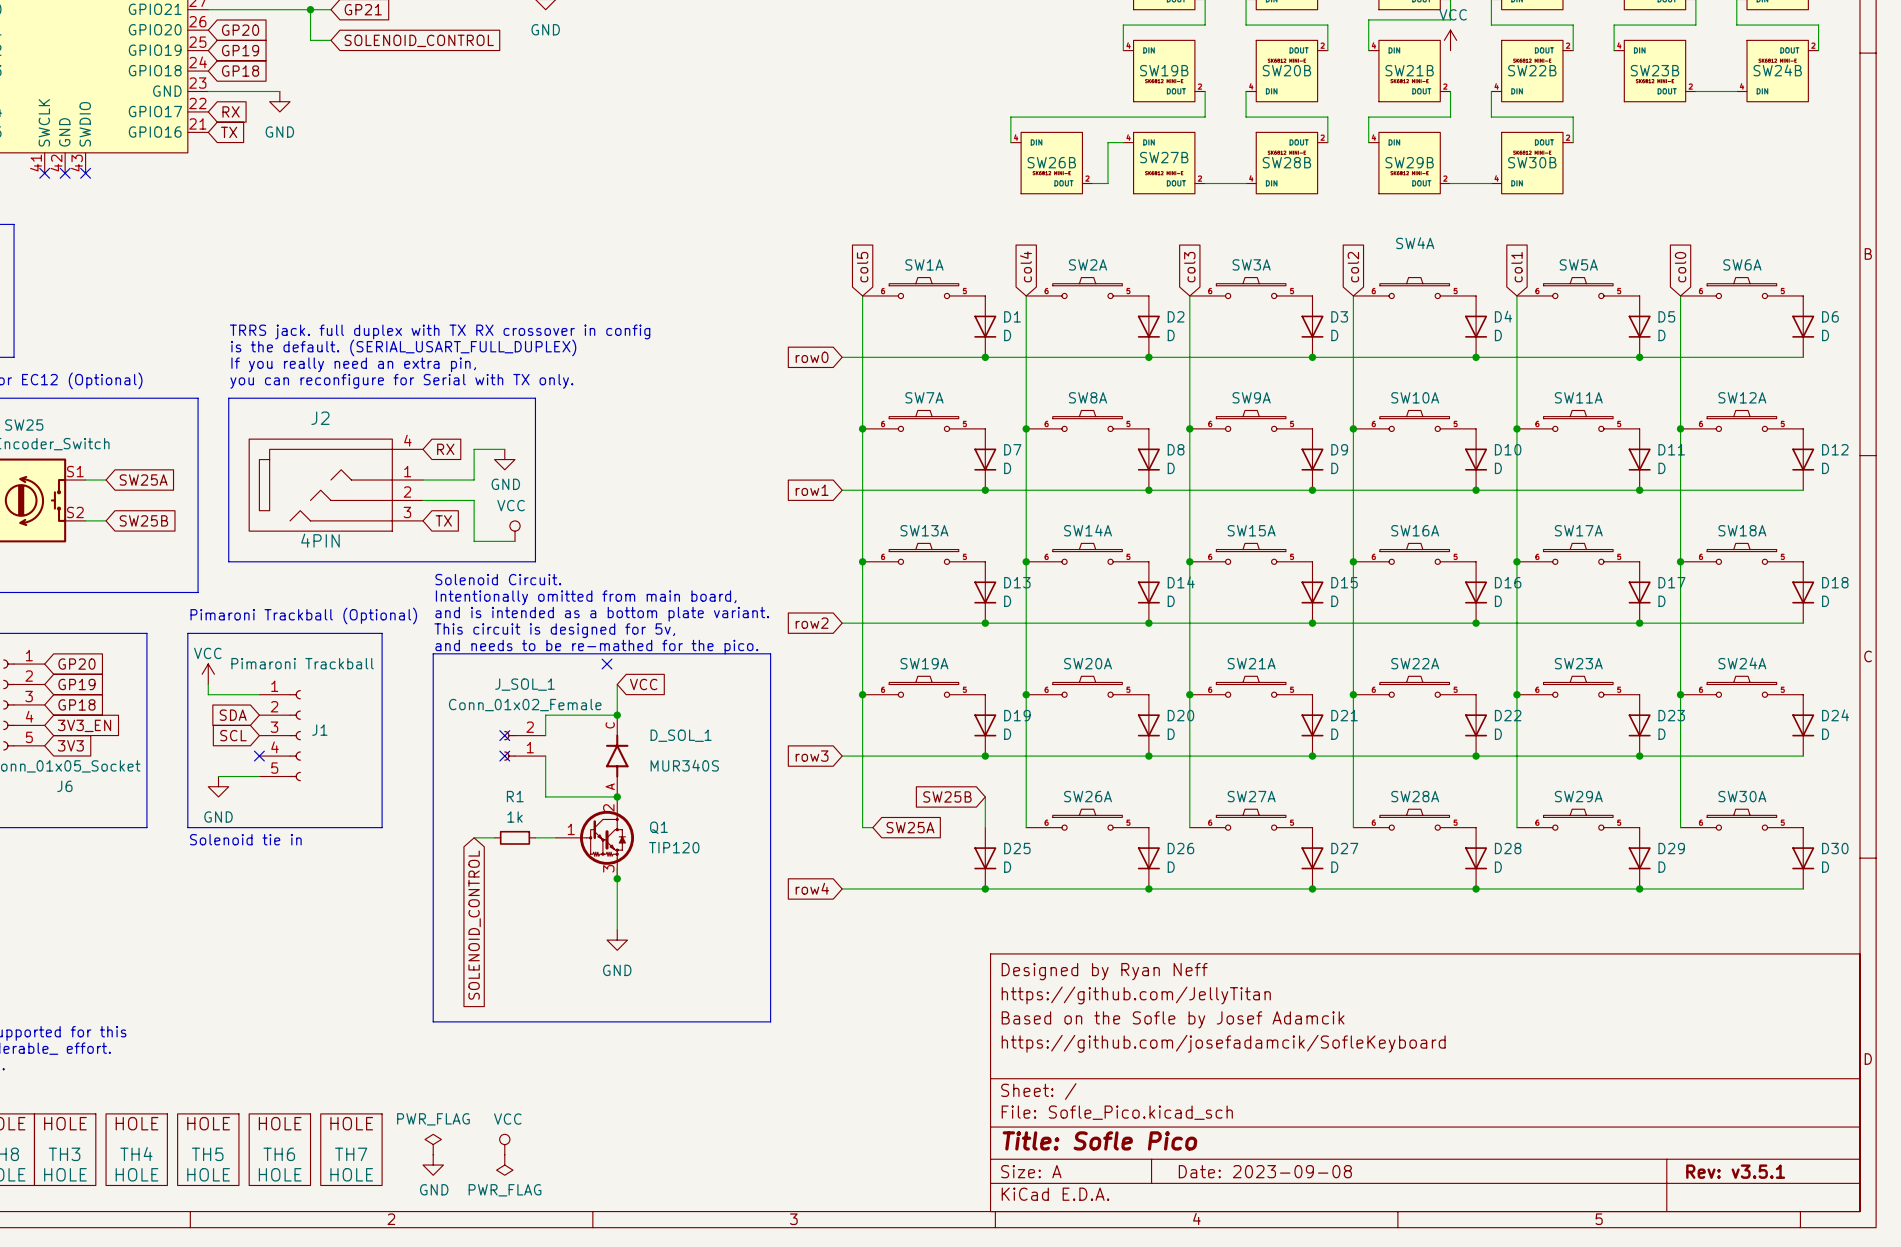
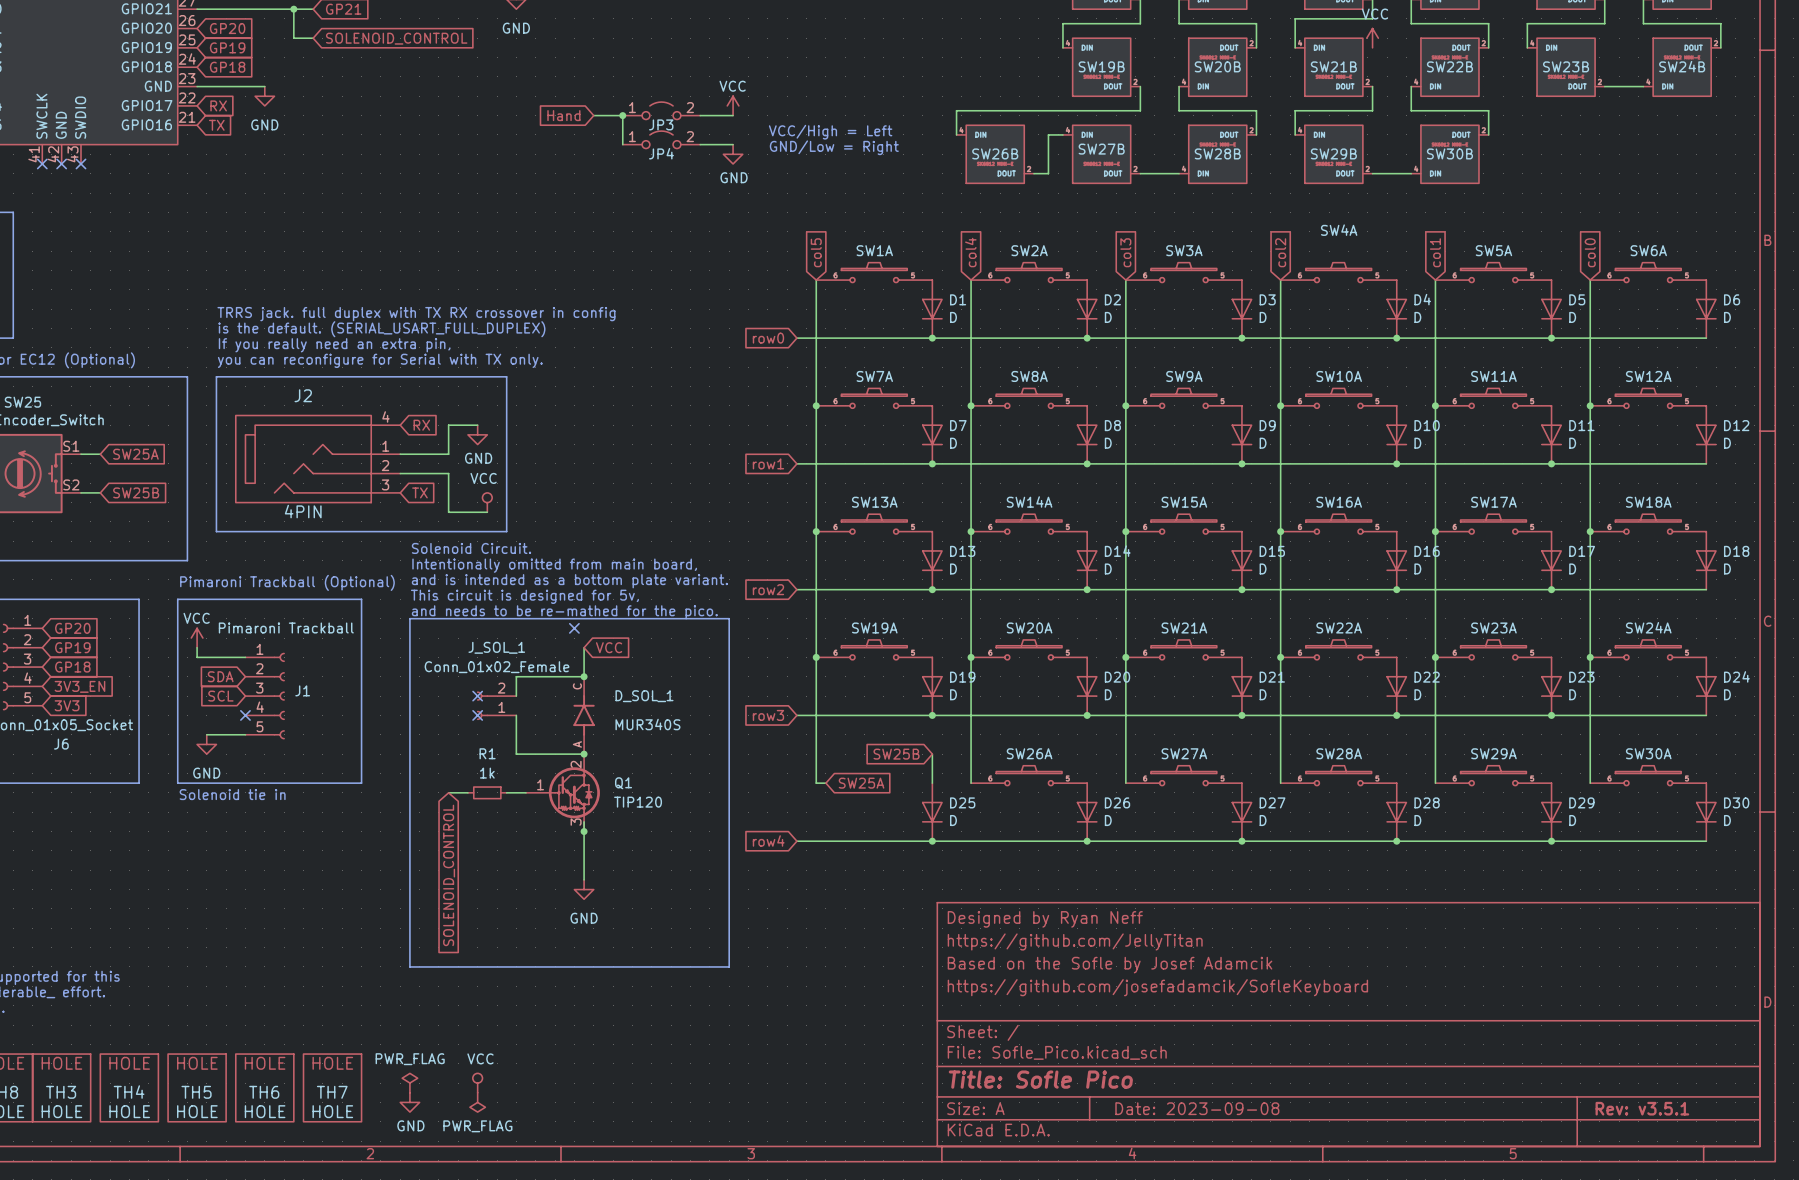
power symbol: none -> VCC (733, 105)
JP3: none -> (661, 110)
global label: none -> Hand (563, 115)
wire: none -> (593, 115) (622, 115) (622, 144)
junction: none -> (622, 115)
wire: none -> (700, 115) (733, 115)
text: none -> VCC/High = Left (830, 132)
JP4: none -> (661, 139)
wire: none -> (700, 144) (733, 144)
text: none -> GND/Low = Right (834, 147)
power symbol: none -> GND (733, 154)

